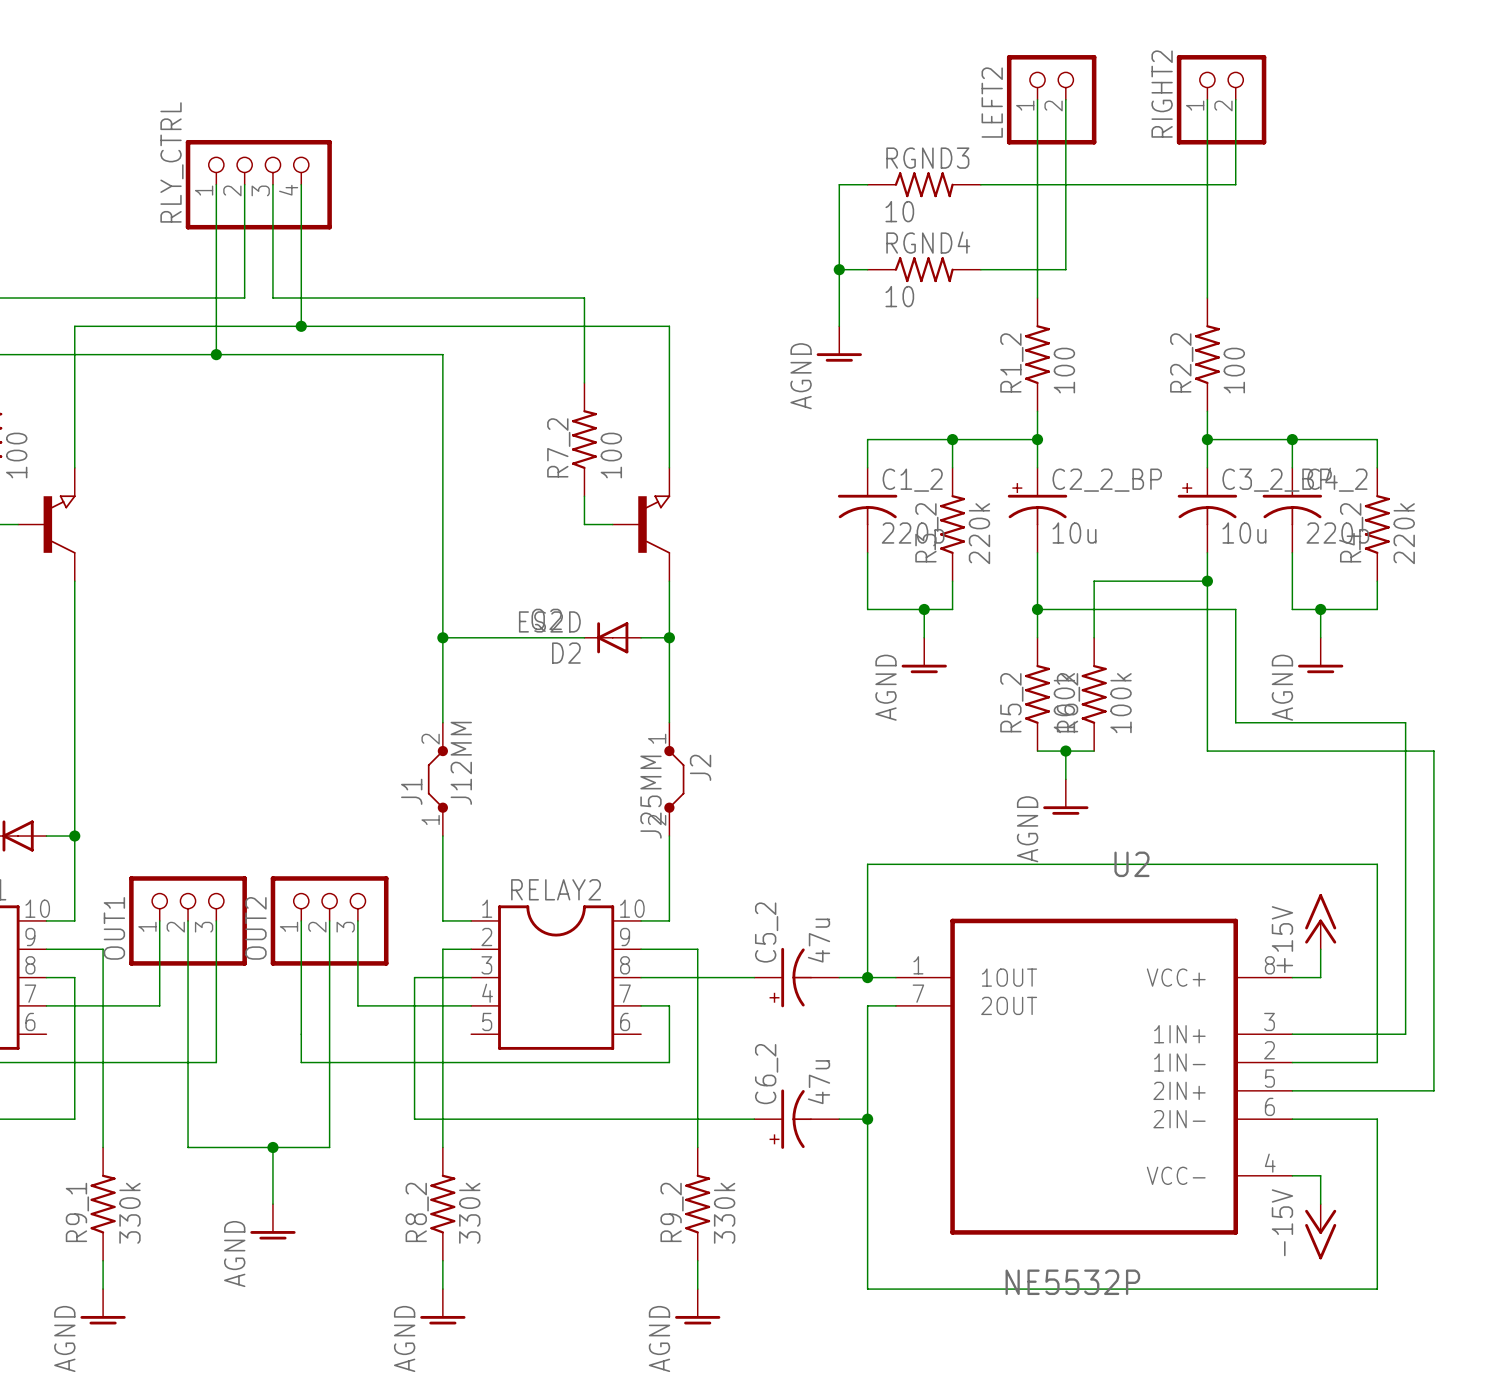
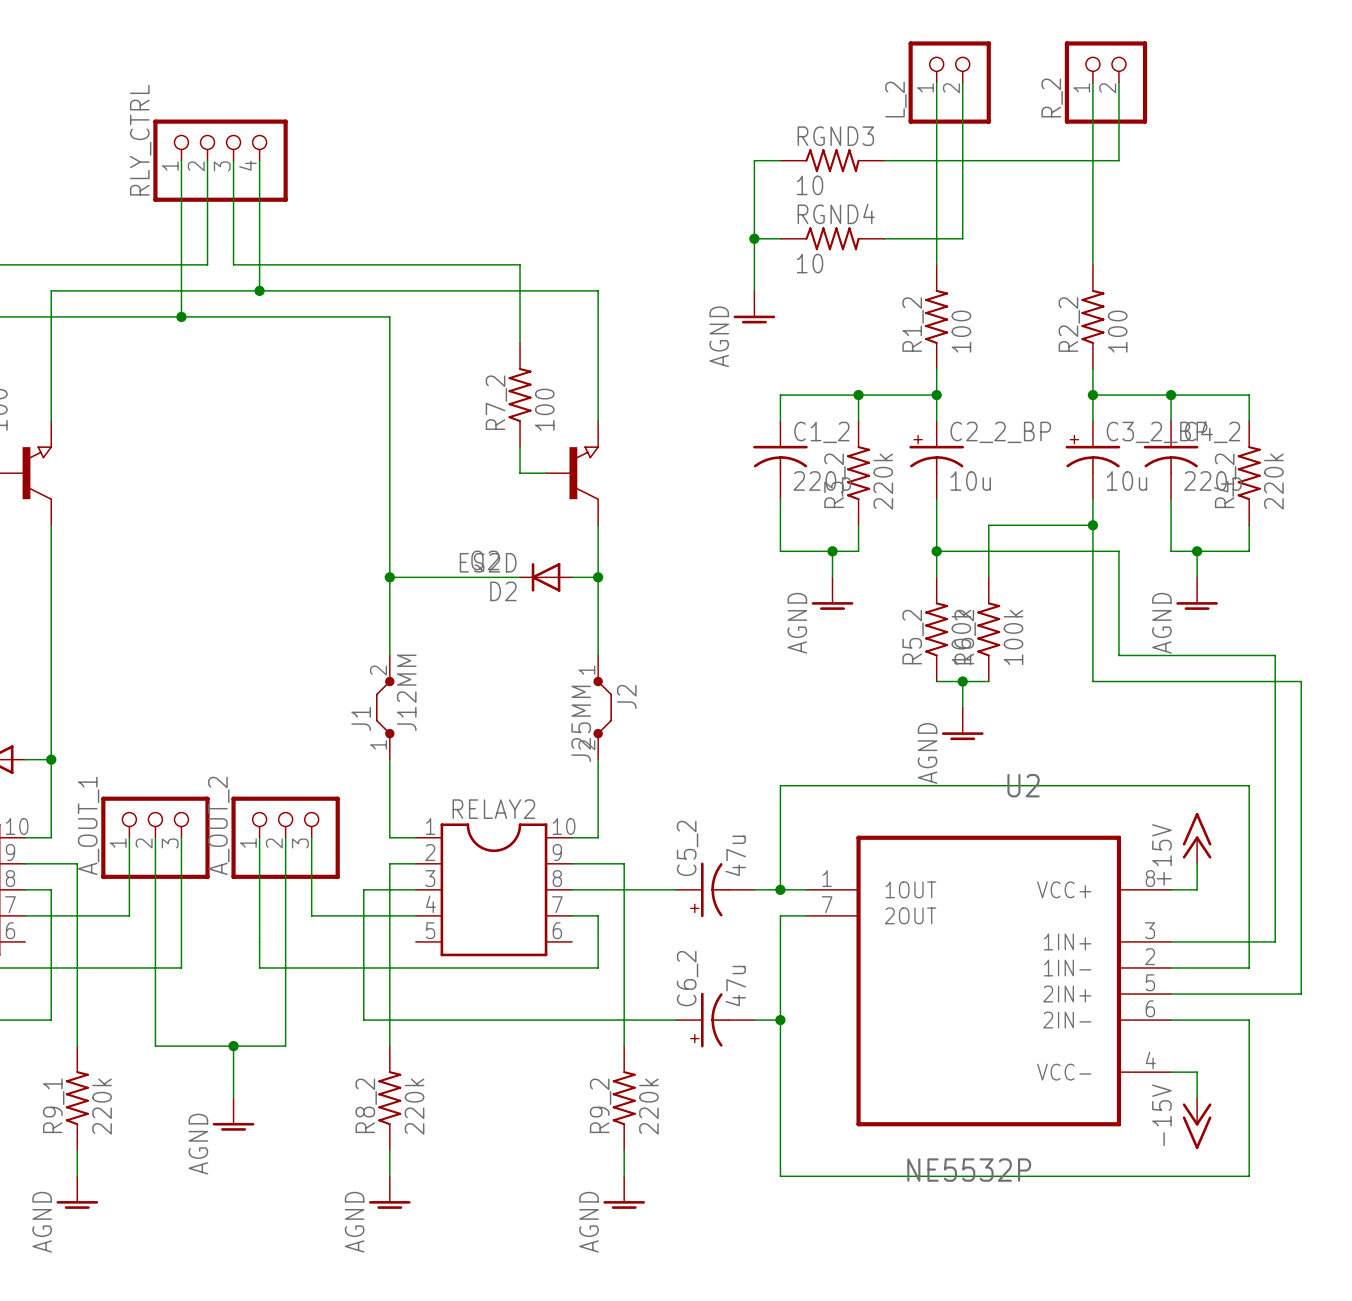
RIGHT2 name: RIGHT2 (1162, 94) -> R_2 (1052, 98)
LEFT2 name: LEFT2 (992, 102) -> L_2 (895, 99)
OUT1 name: OUT1 (114, 928) -> A_OUT_1 (88, 825)
OUT2 name: OUT2 (255, 928) -> A_OUT_2 (218, 825)
R9_1 value: 330k (129, 1213) -> 220k (102, 1106)
R8_2 value: 330k (469, 1213) -> 220k (414, 1106)
R9_2 value: 330k (724, 1213) -> 220k (648, 1106)

